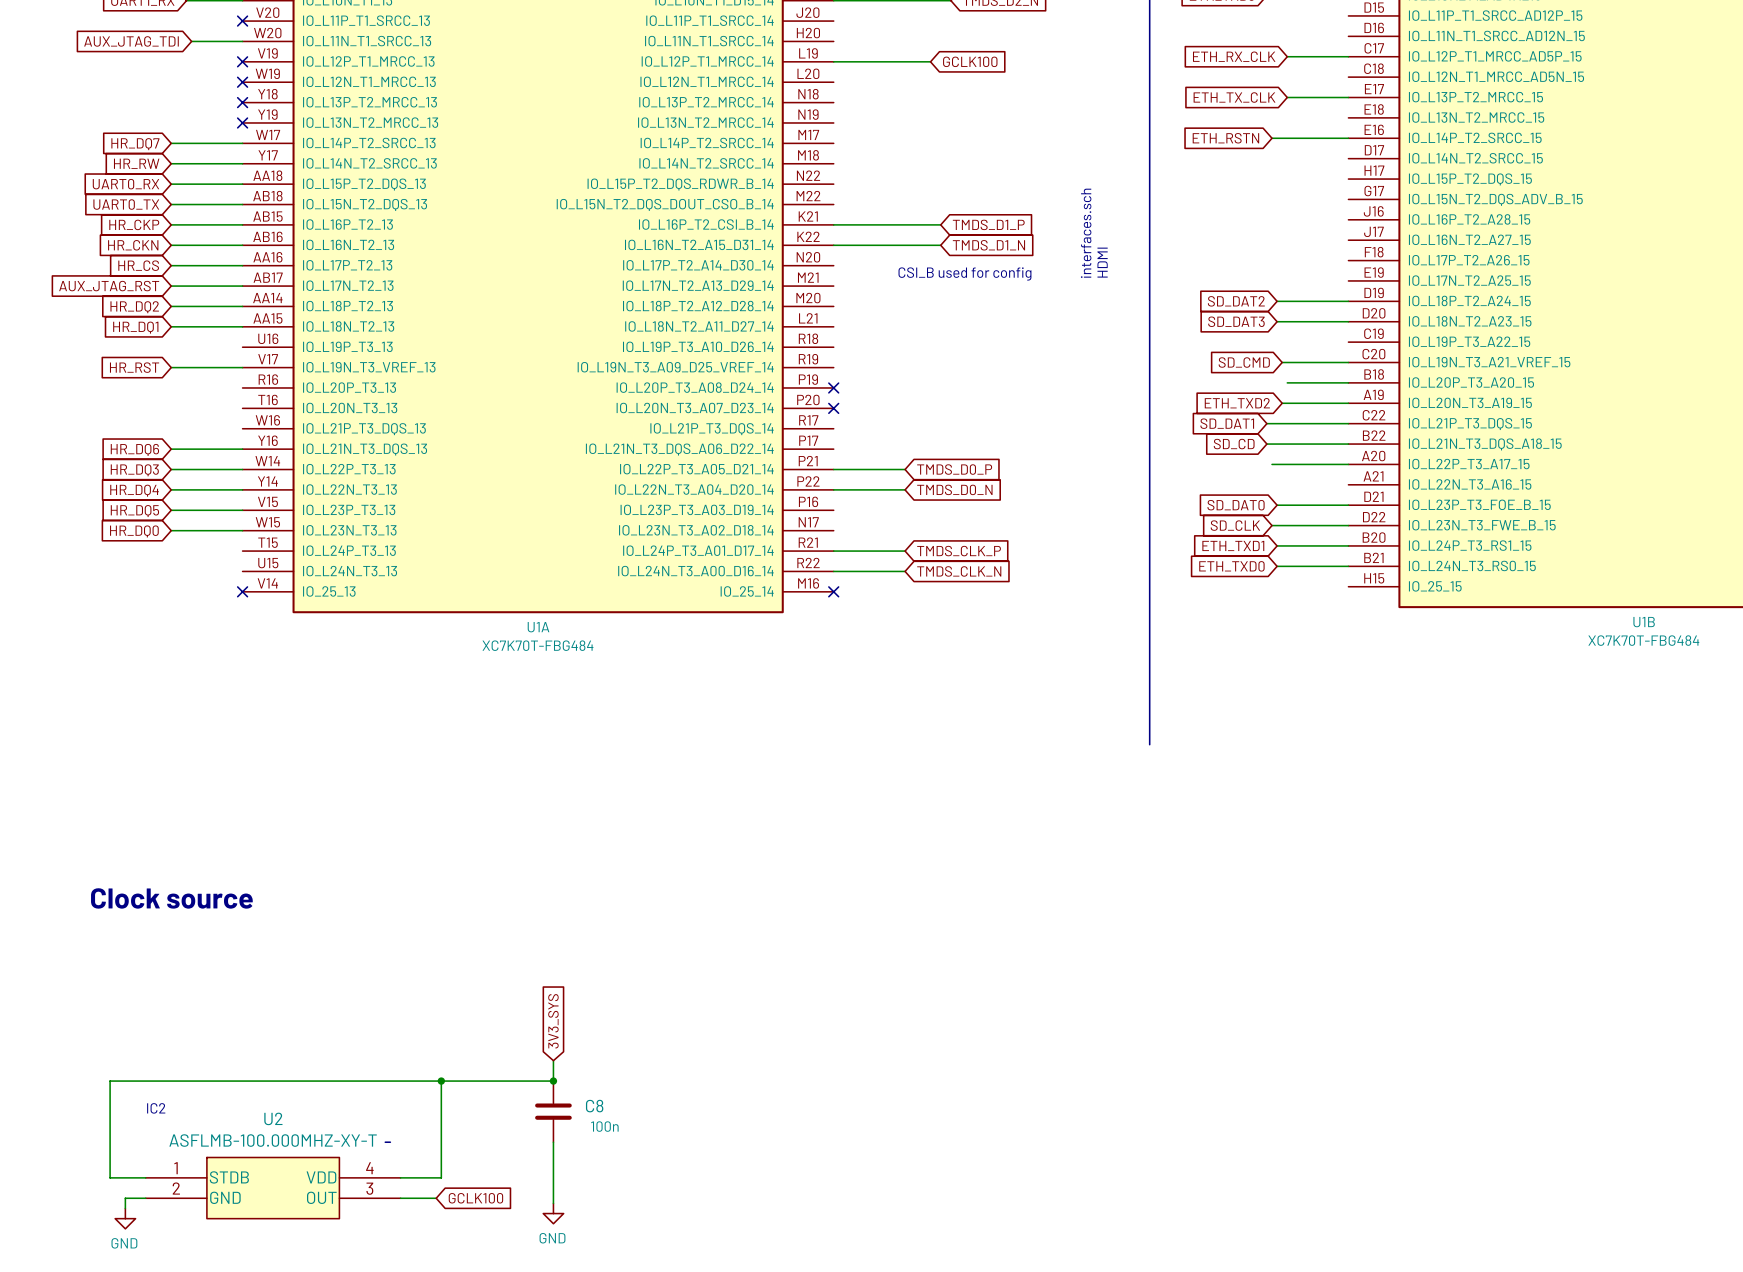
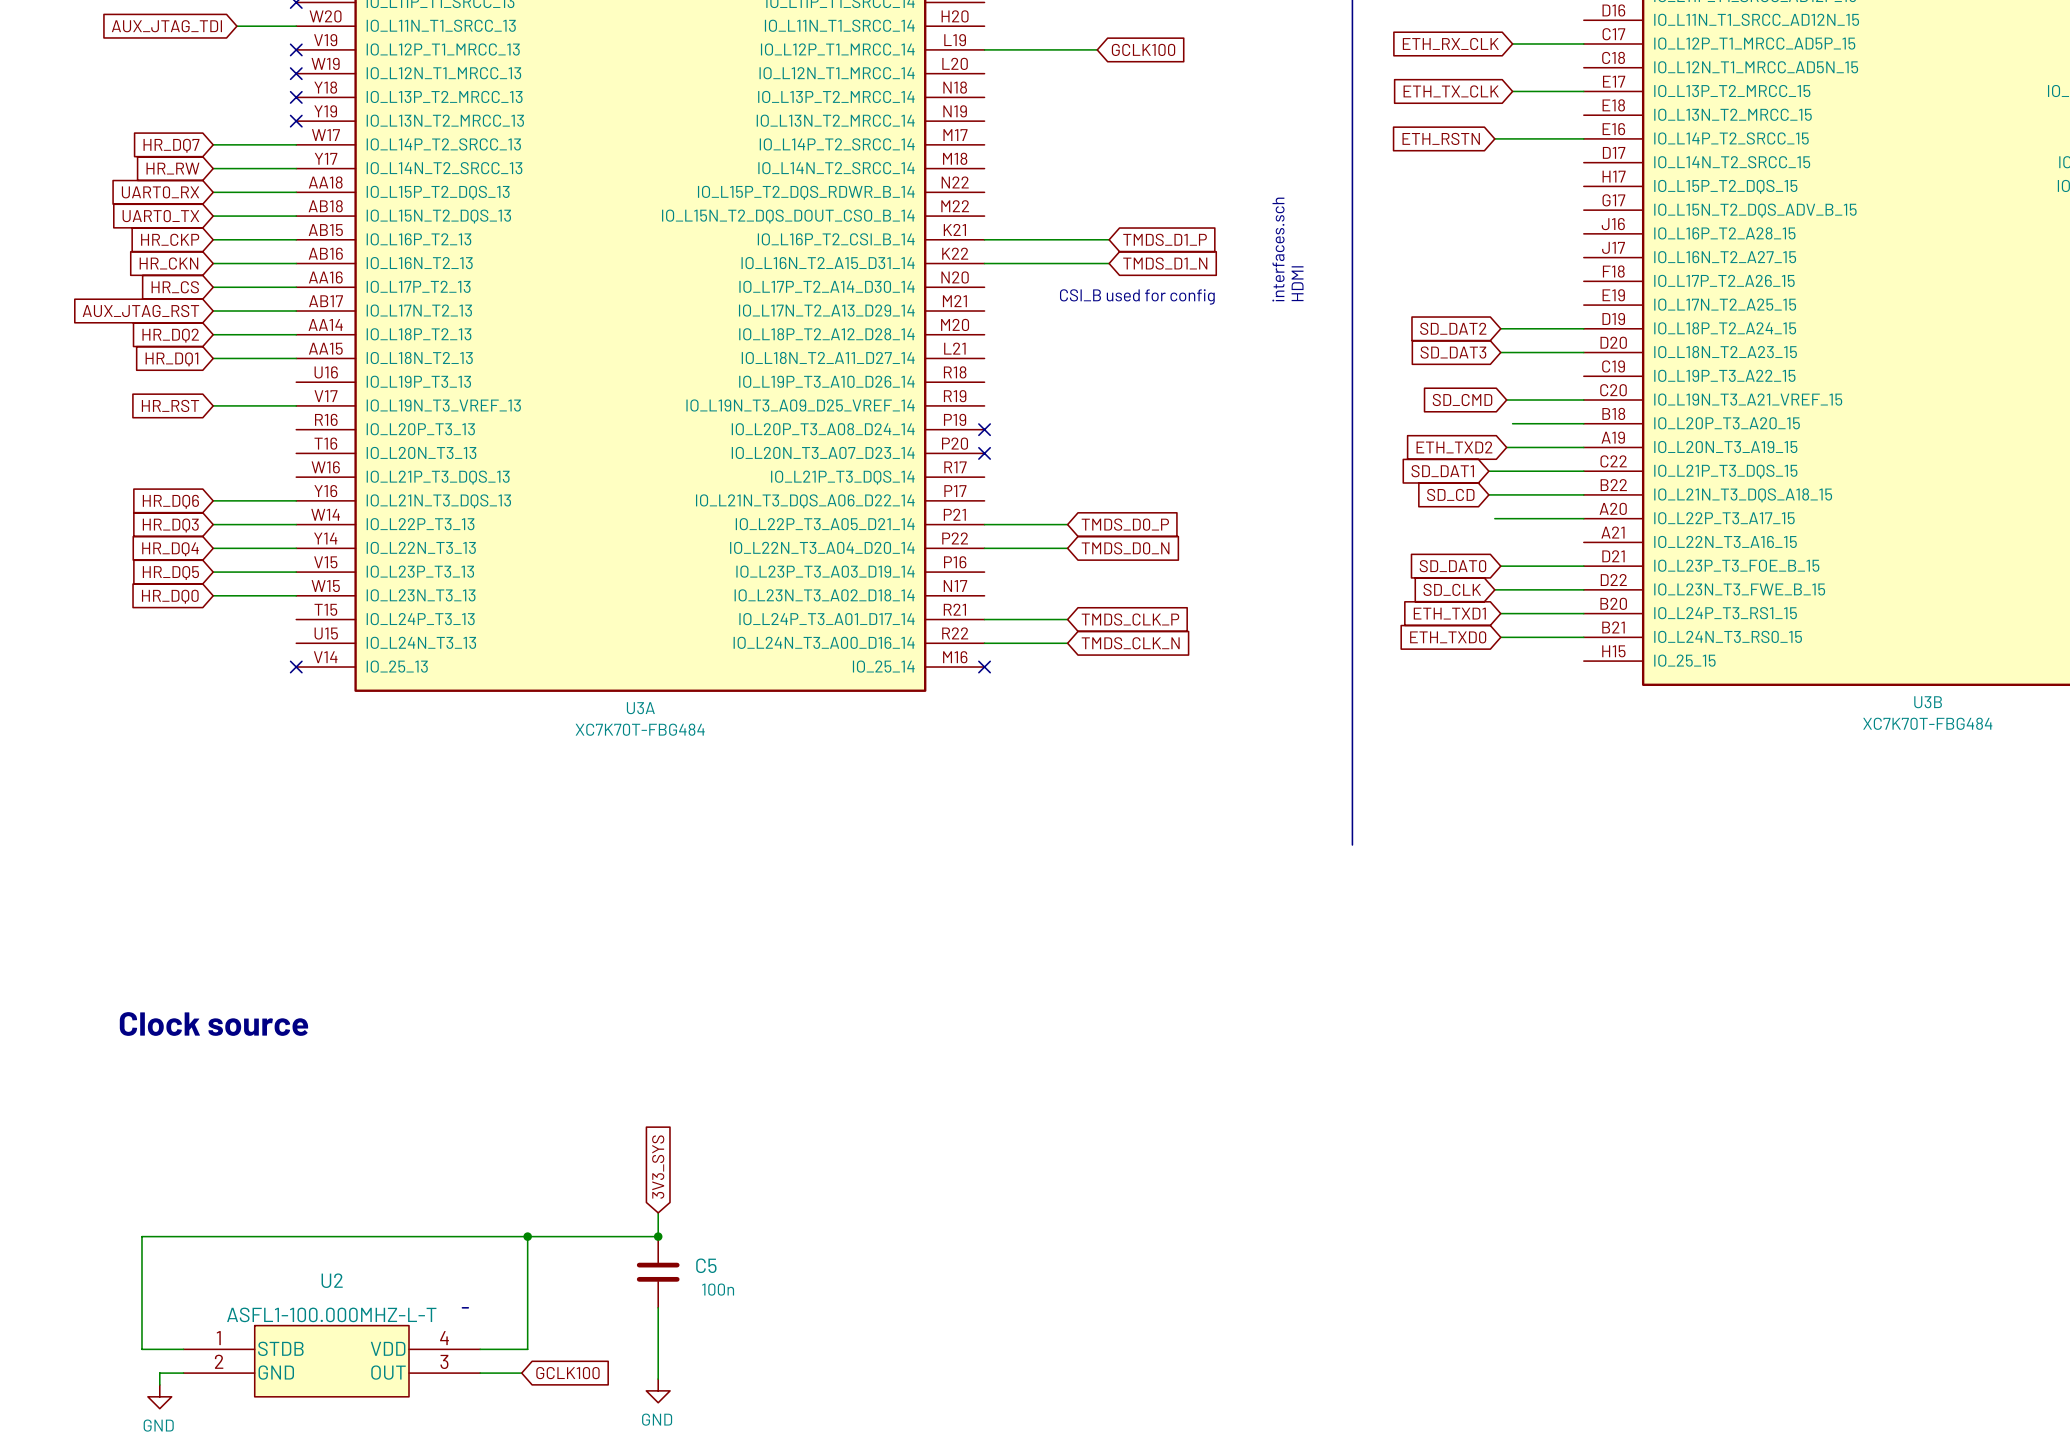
U1B name: U1B (1644, 622) -> U3B (1928, 702)
U1A name: U1A (538, 627) -> U3A (640, 708)
C8 name: C8 (594, 1106) -> C5 (706, 1265)
text: IC2 (156, 1108) -> none
U2 value: ASFLMB-100.000MHZ-XY-T (273, 1140) -> ASFL1-100.000MHZ-L-T (331, 1314)

